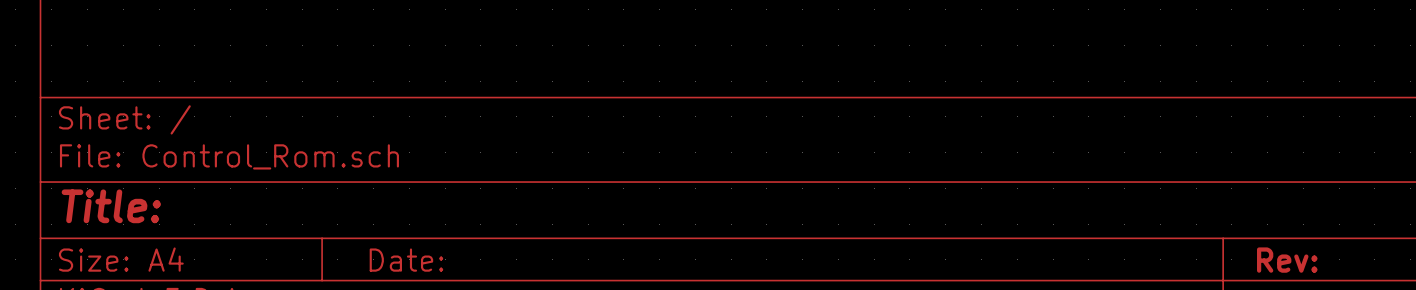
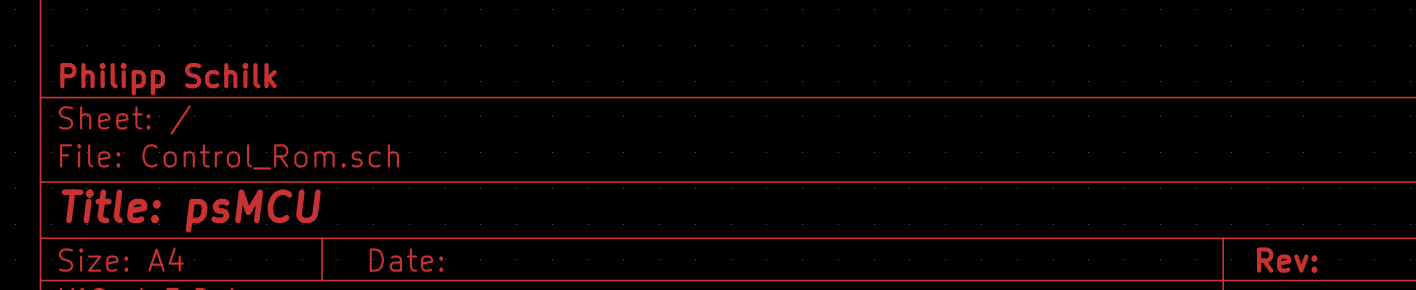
title block: none -> Philipp Schilk (168, 79)
title block: Title: (111, 206) -> Title: psMCU (191, 211)

